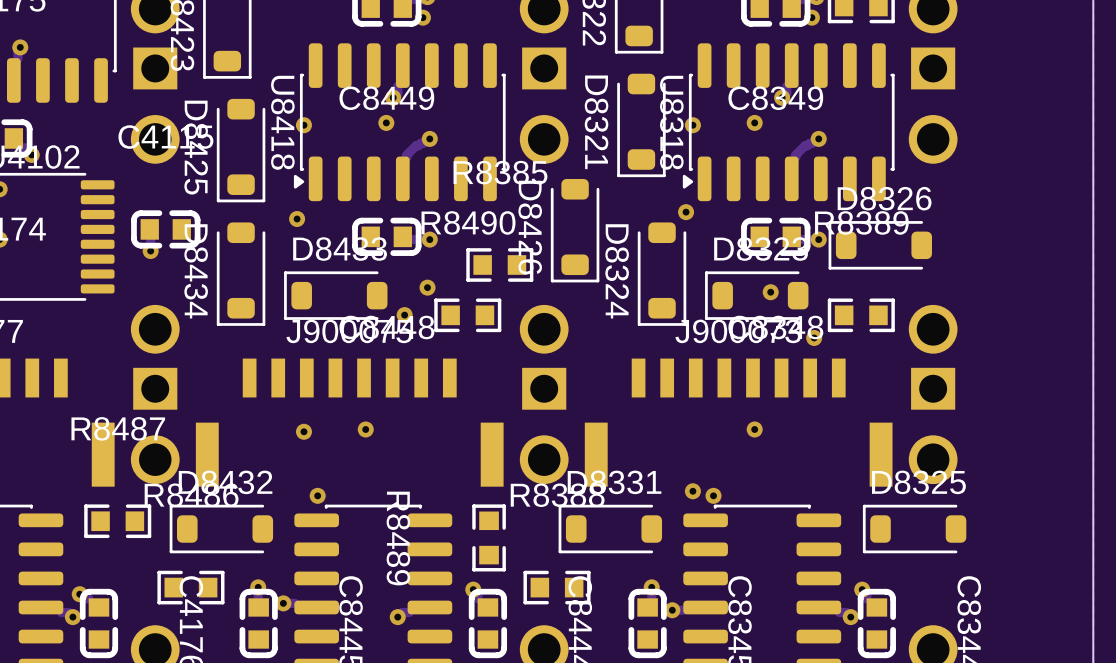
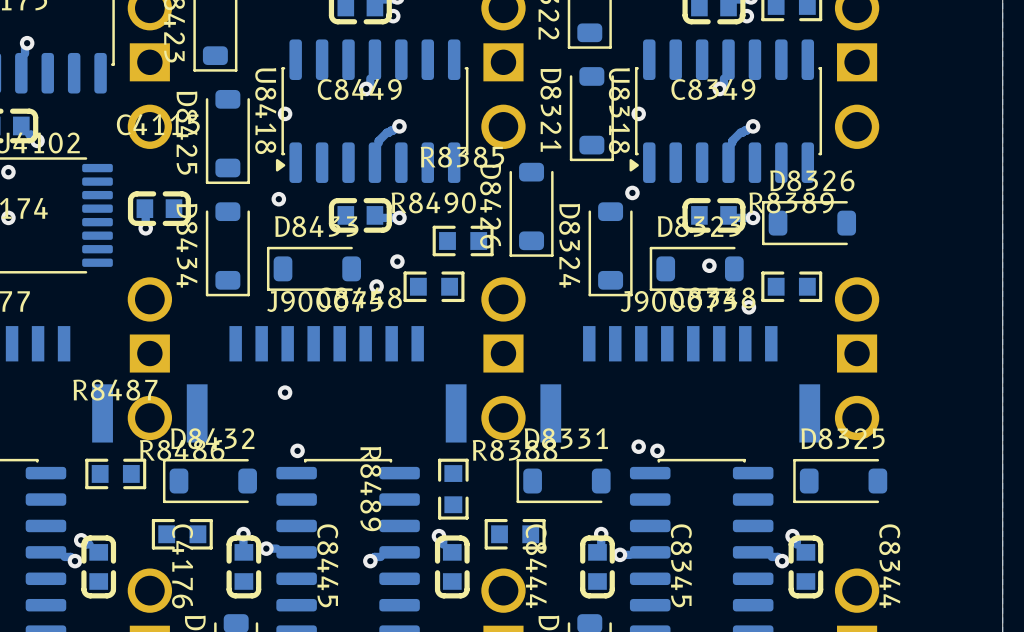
via: (386, 122) -> none
via: (754, 122) -> none
via: (365, 429) -> none
via: (754, 429) -> none

